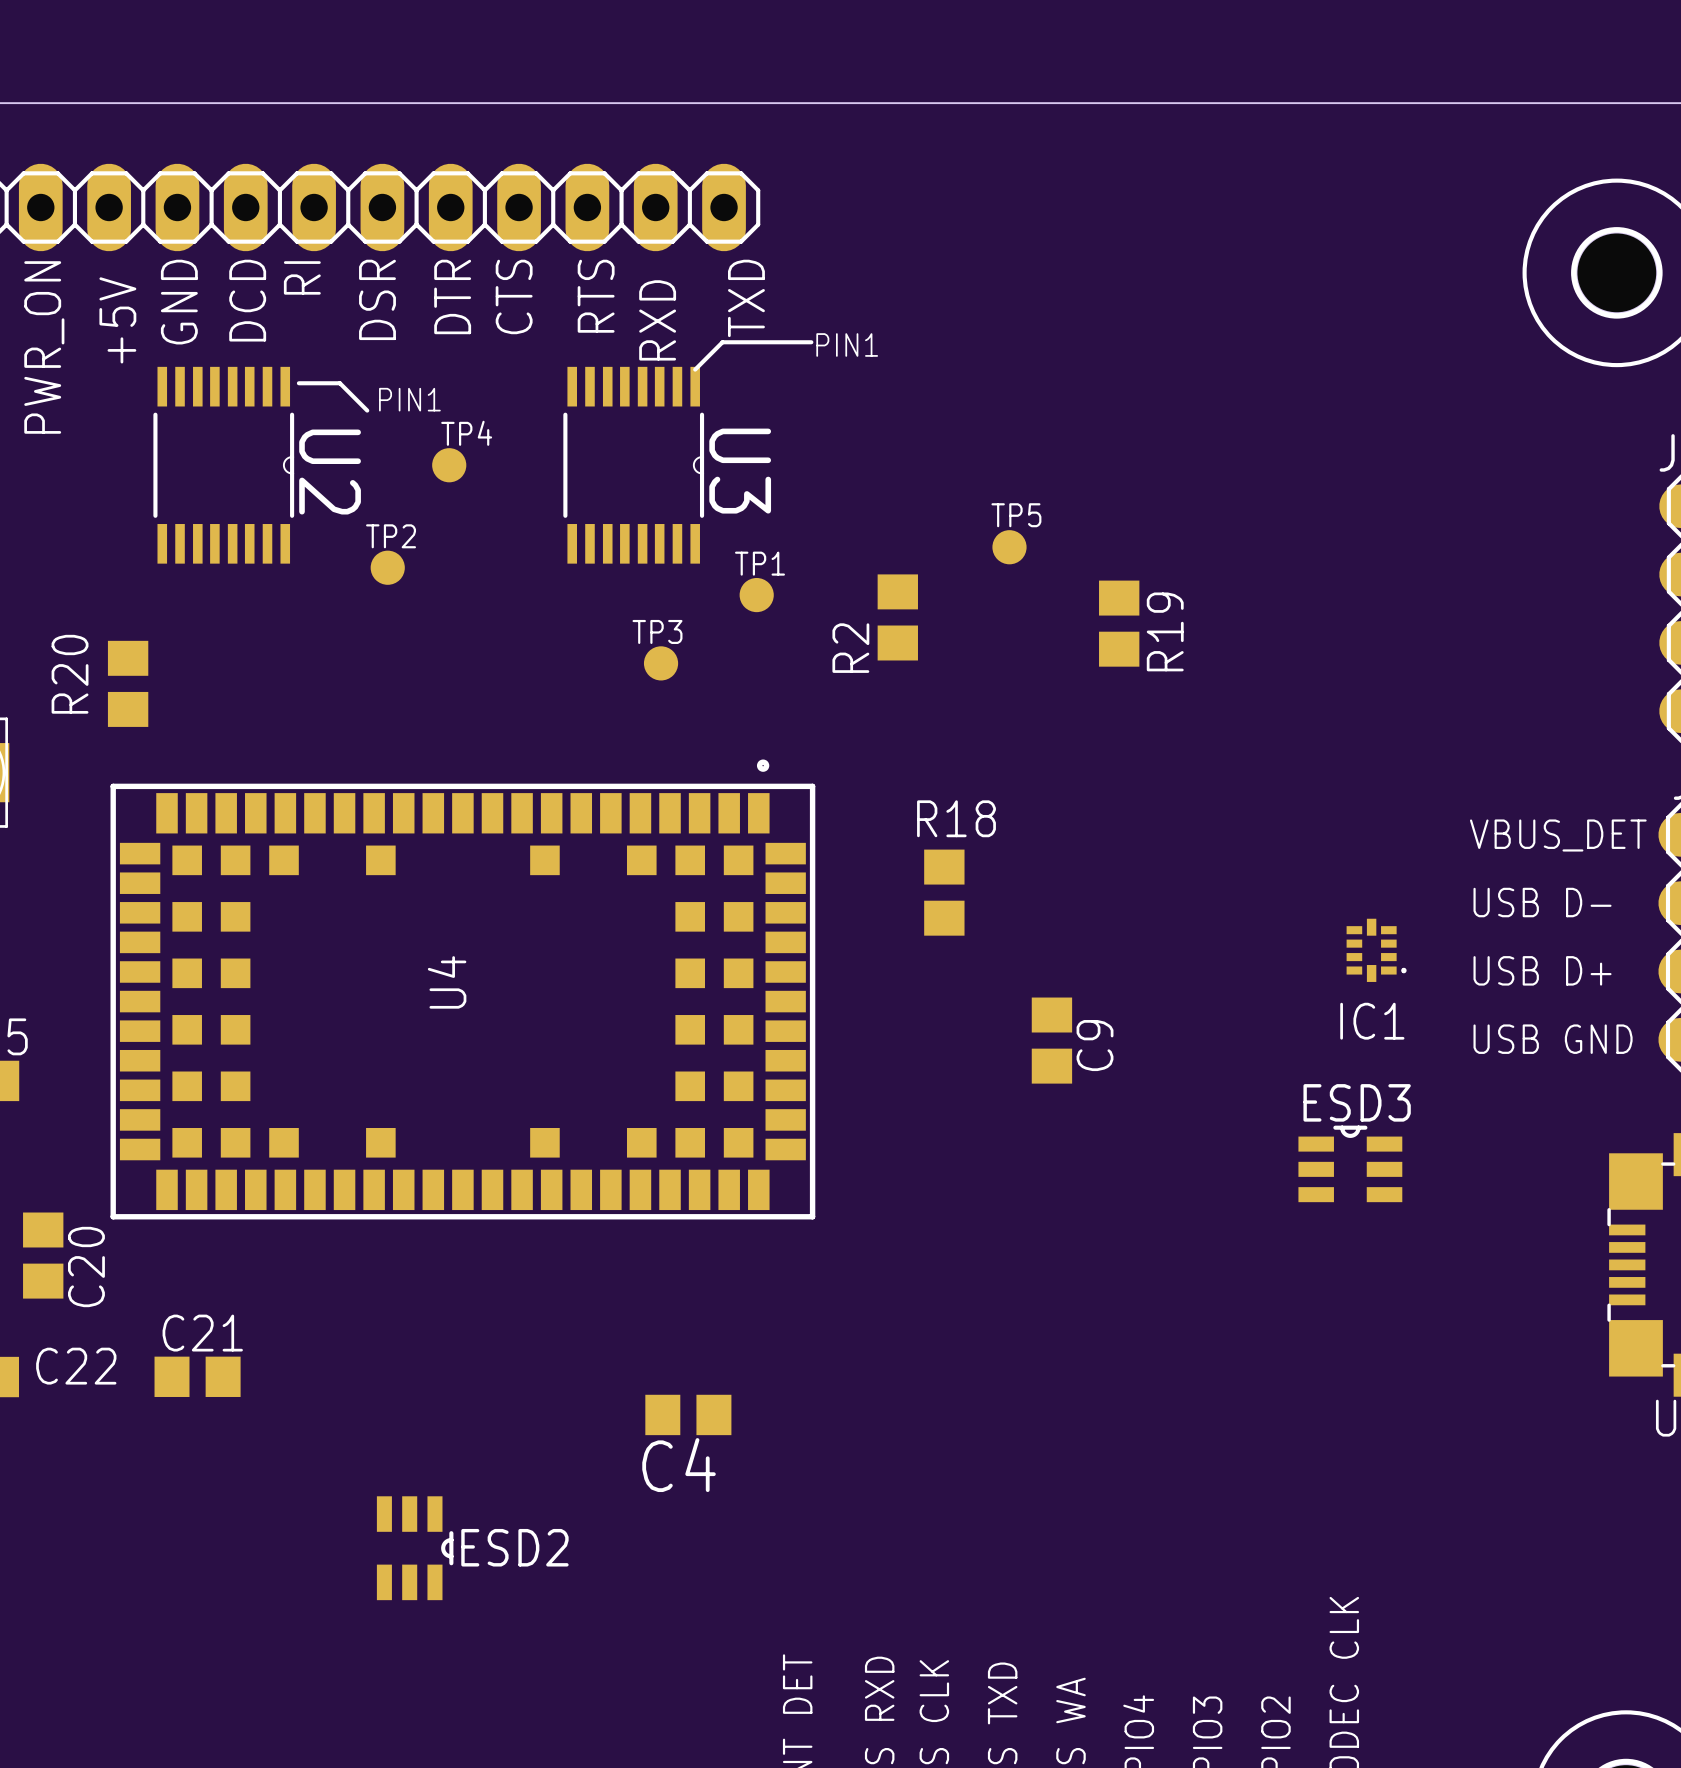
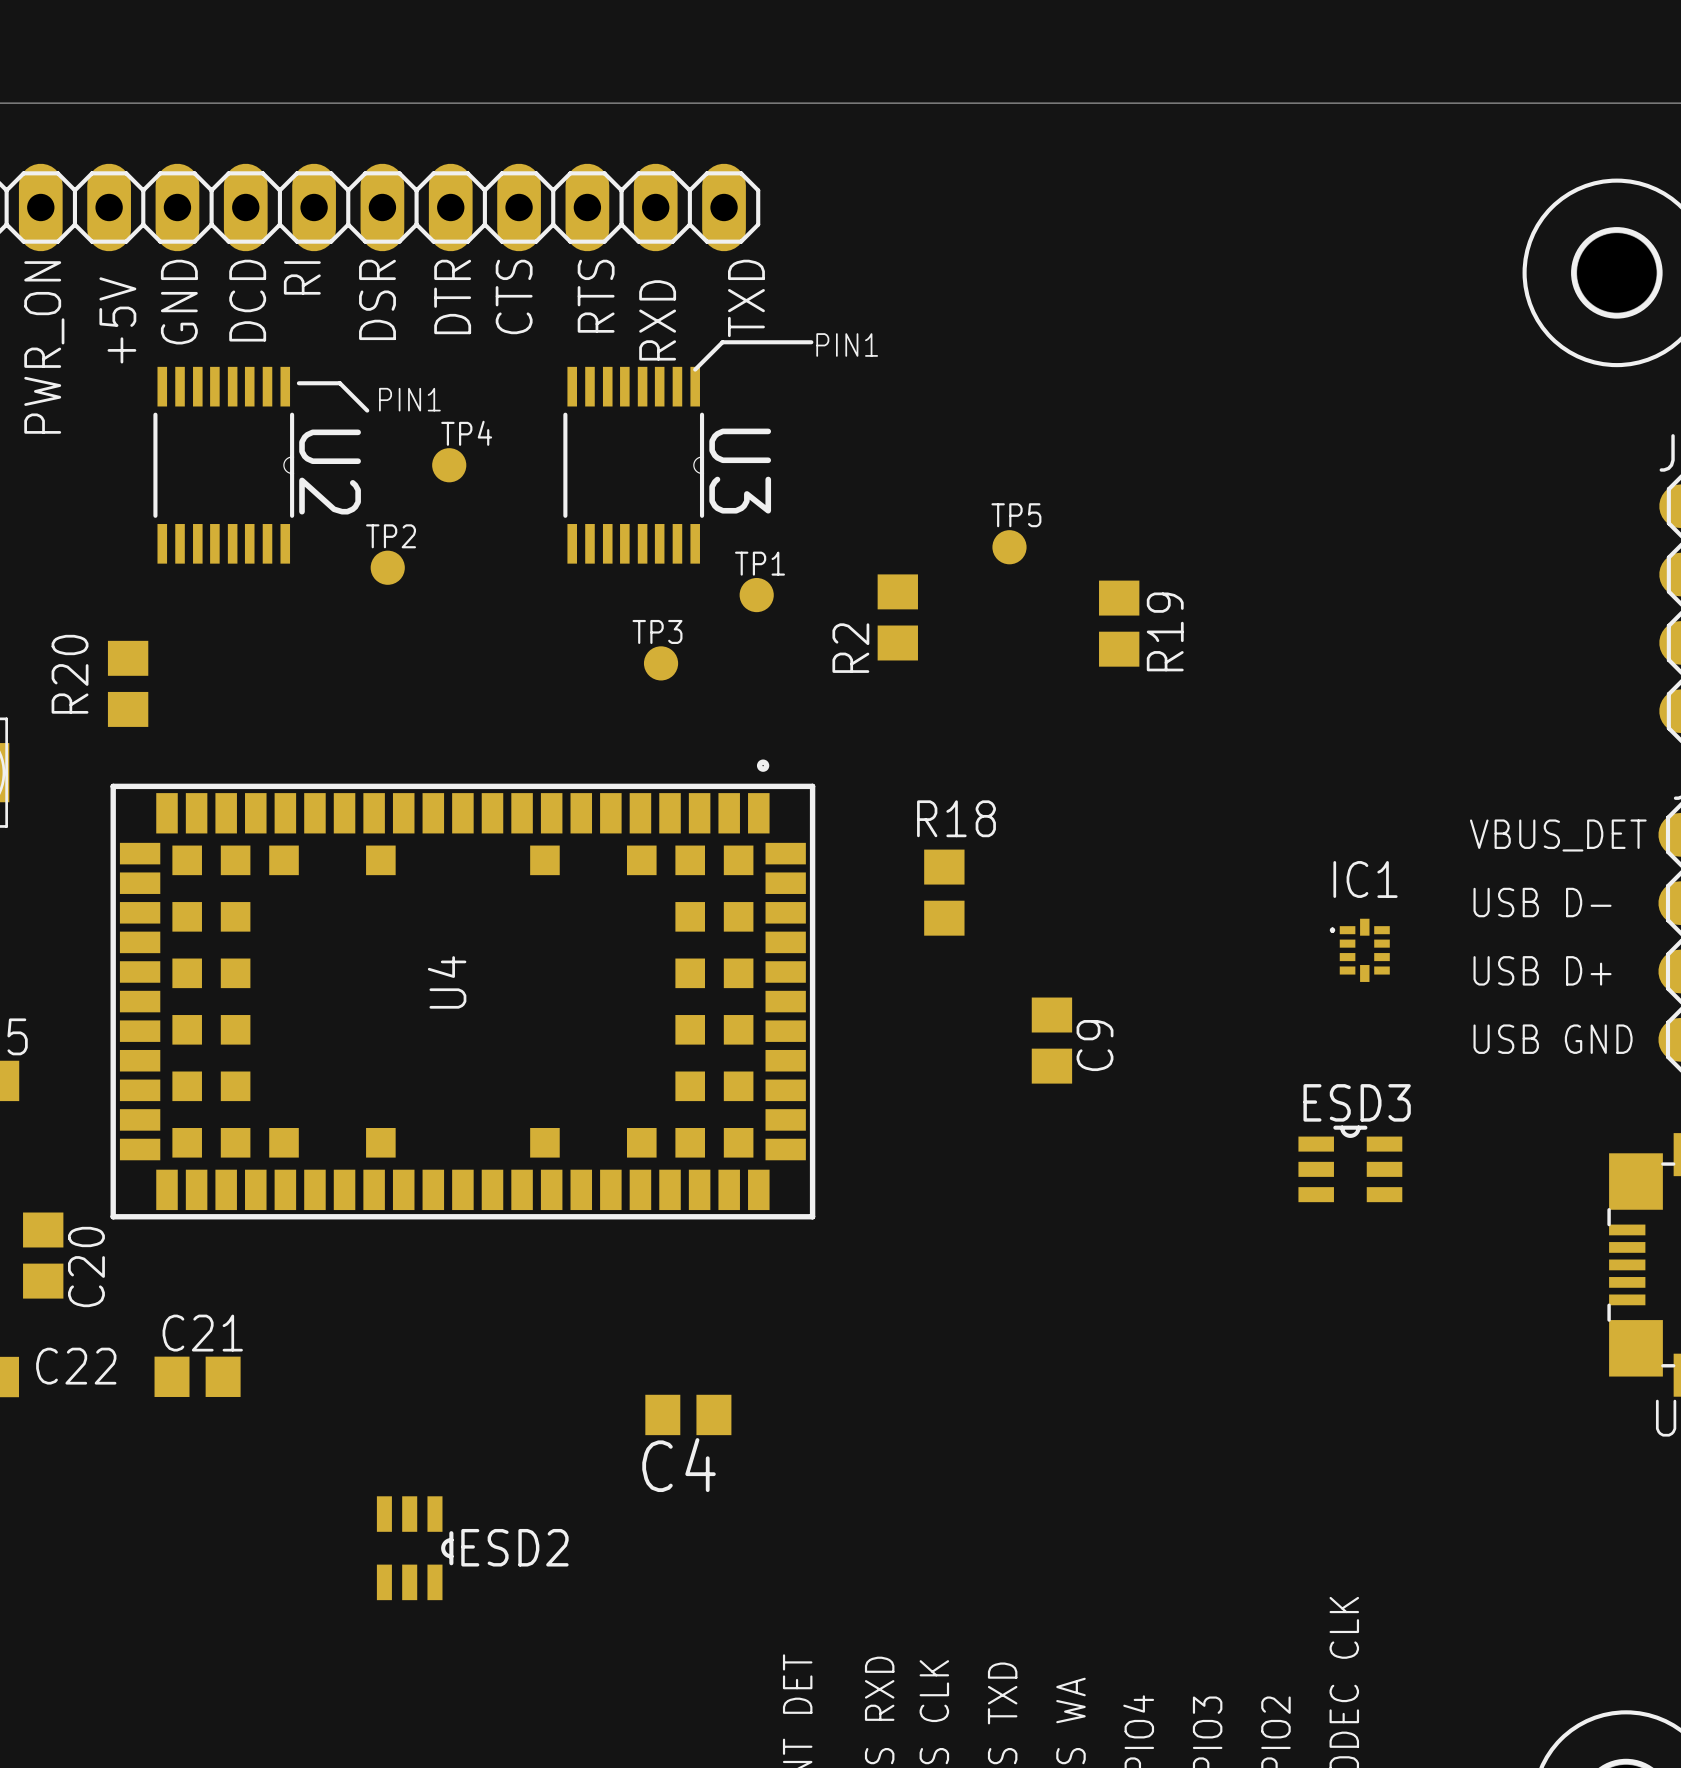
IC1 rotation: 0° (1376, 950) -> 180° (1359, 950)

